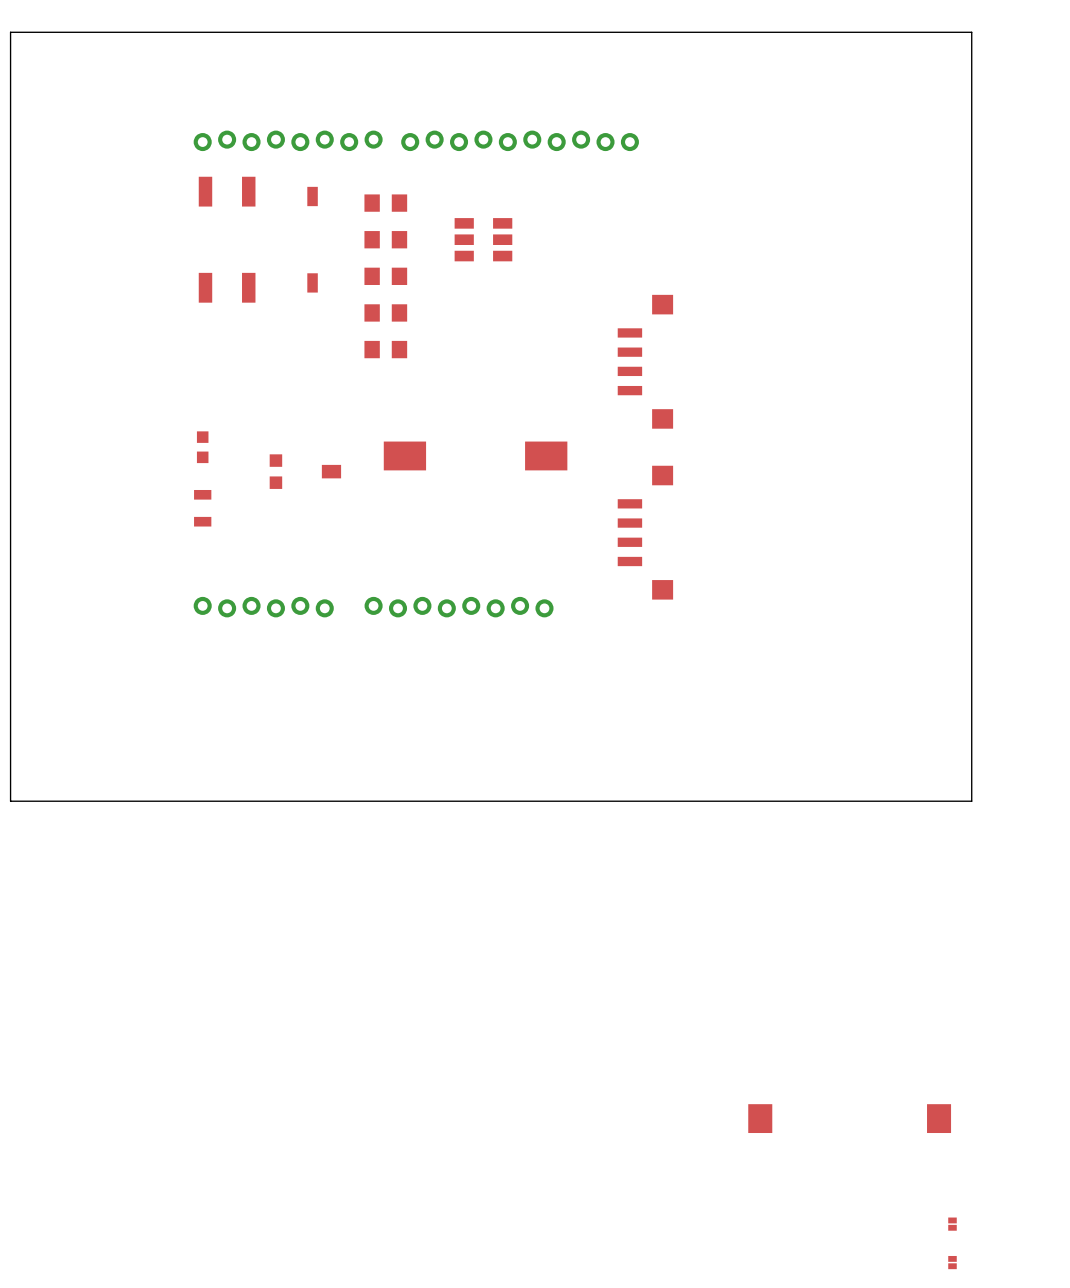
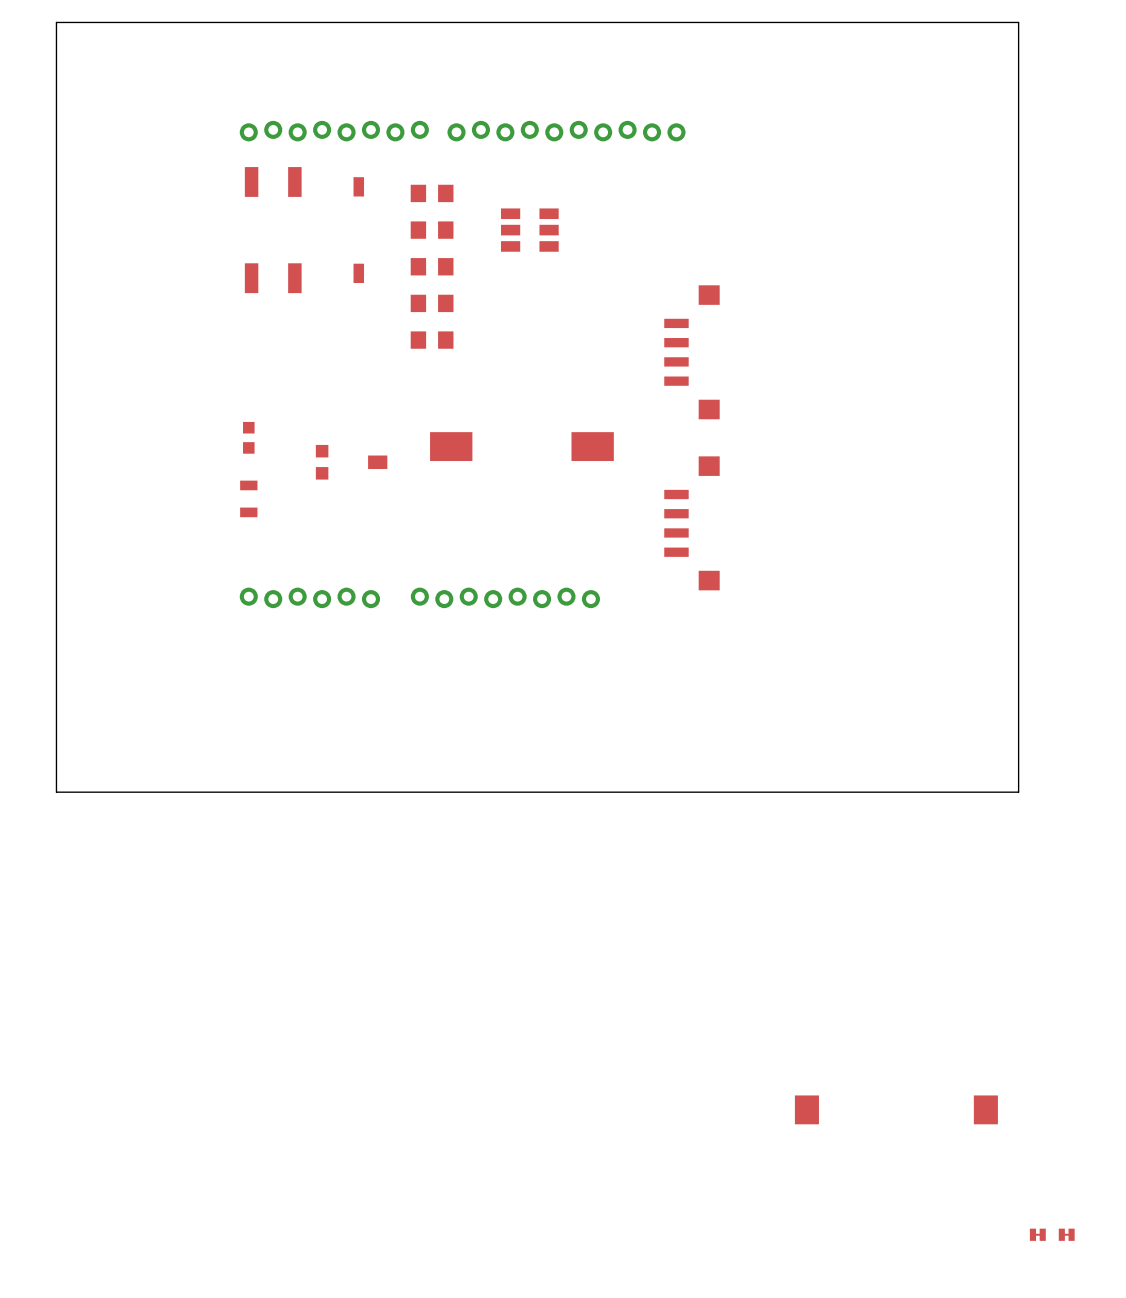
part: (952, 1224) -> none
part: none -> (1037, 1234)
part: none -> (1066, 1234)
part: (952, 1262) -> none

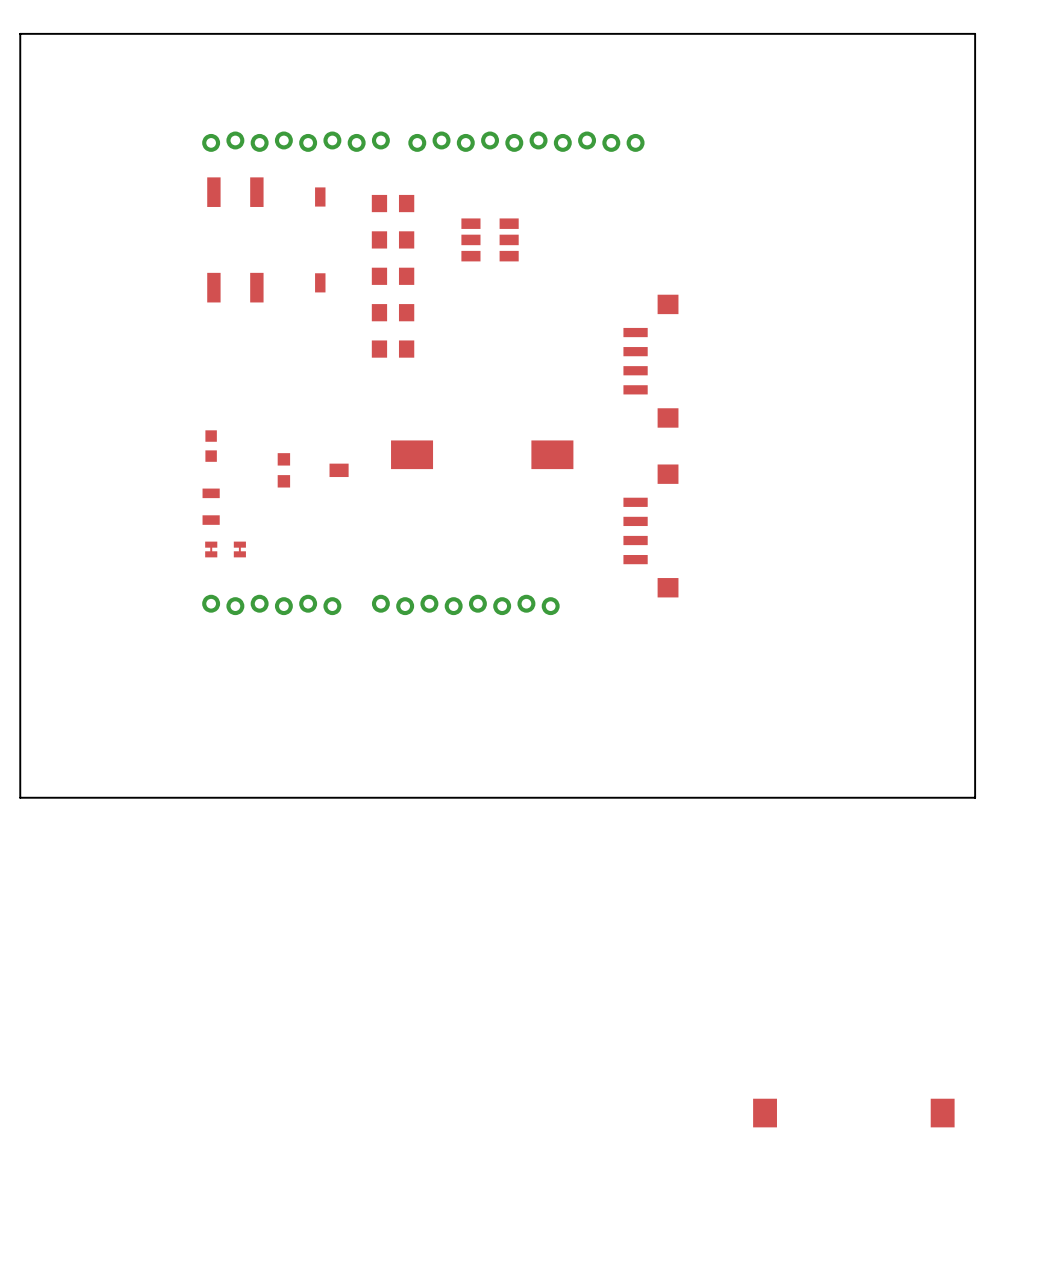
part: none -> (211, 549)
part: none -> (239, 549)
part: (1037, 1234) -> none
part: (1066, 1234) -> none

